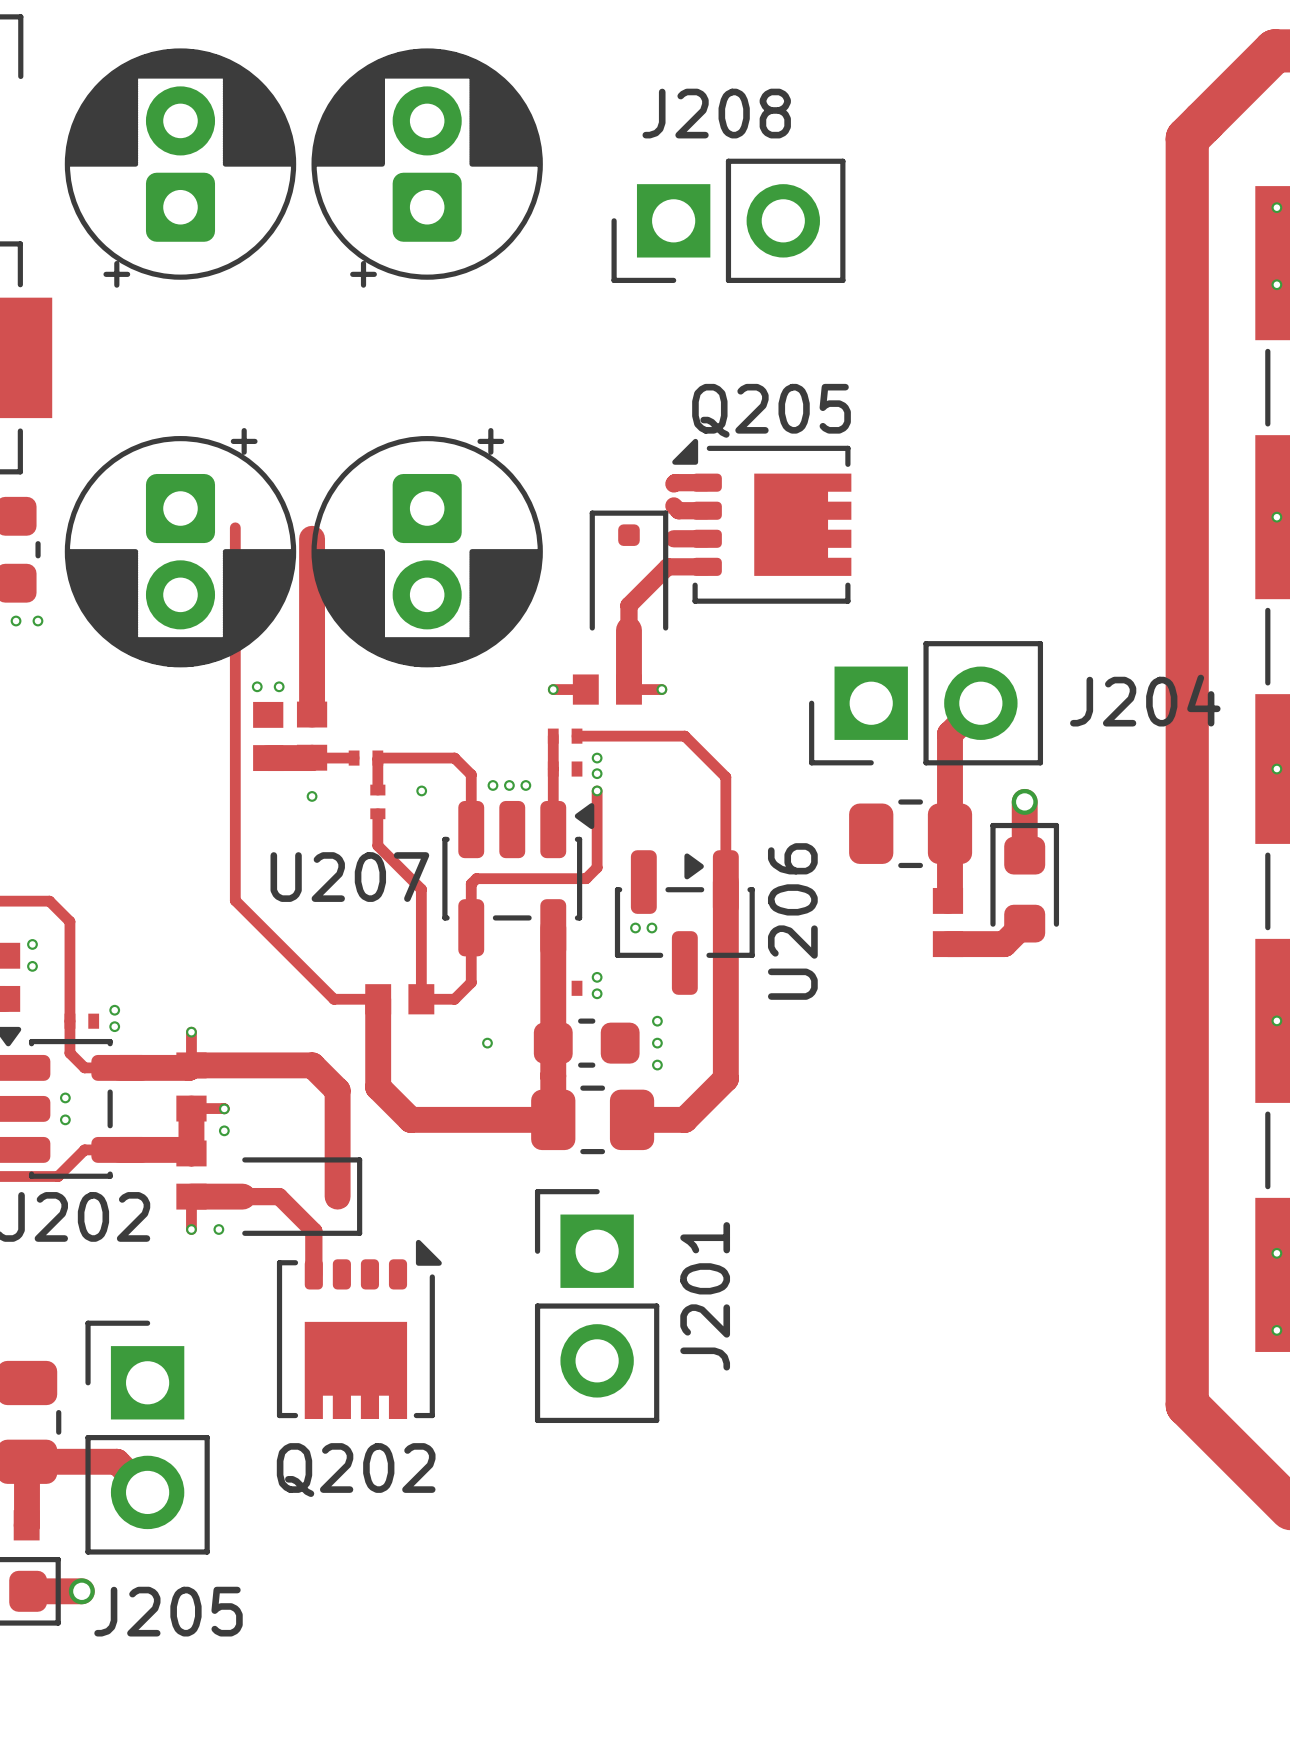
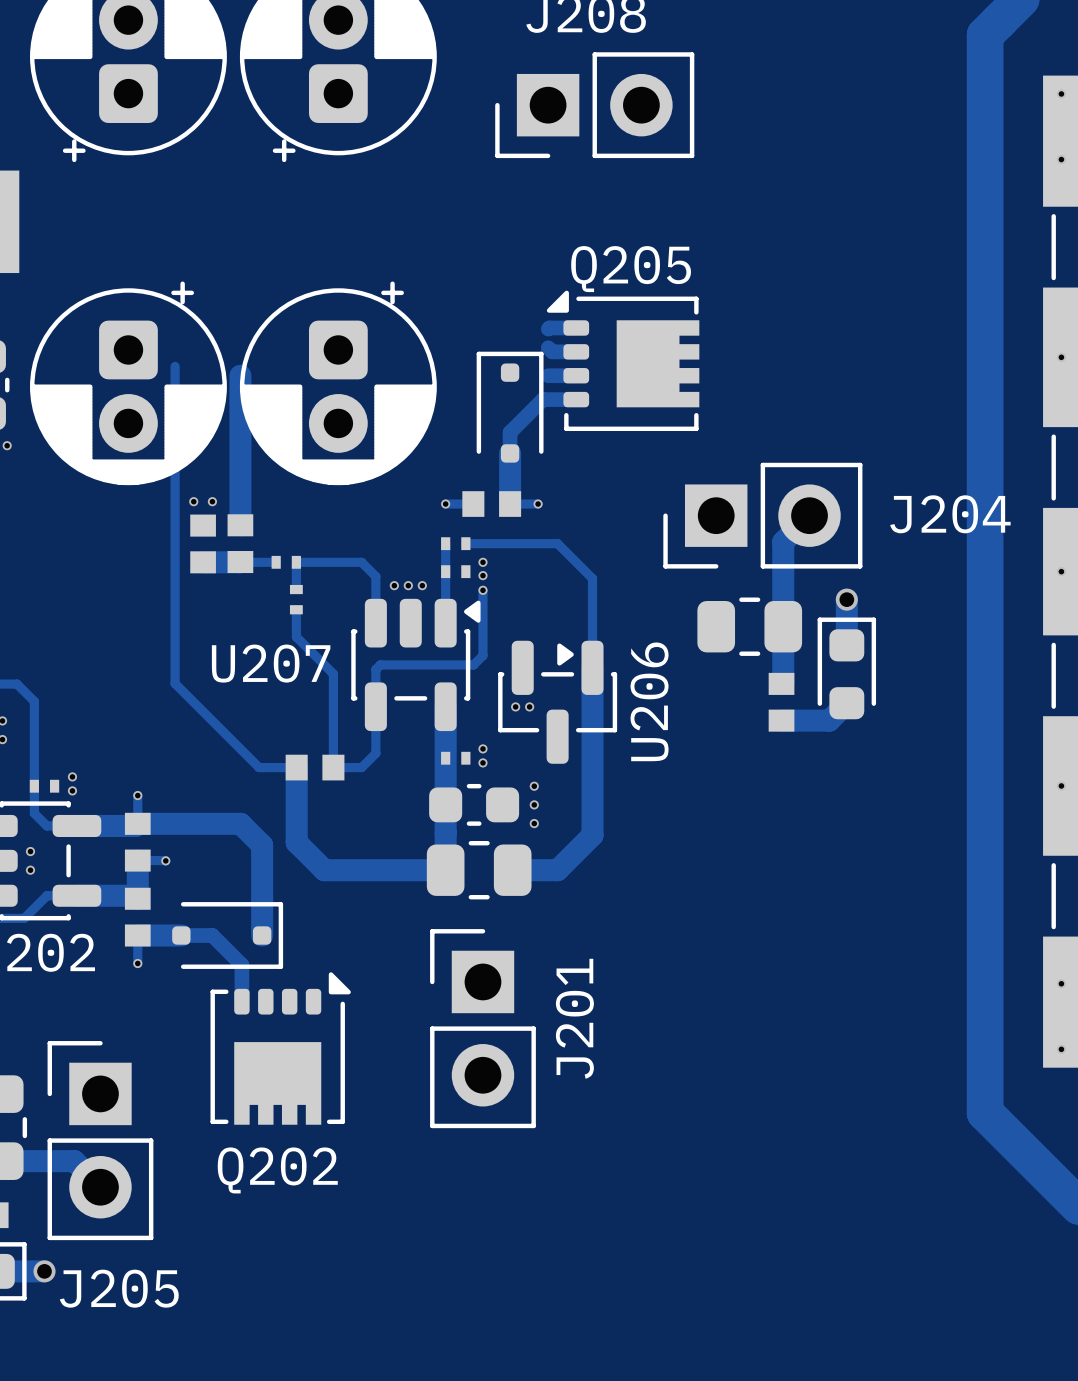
via: (421, 790) -> none
via: (312, 796) -> none
via: (487, 1043) -> none
via: (224, 1130) -> none
via: (218, 1229) -> none

